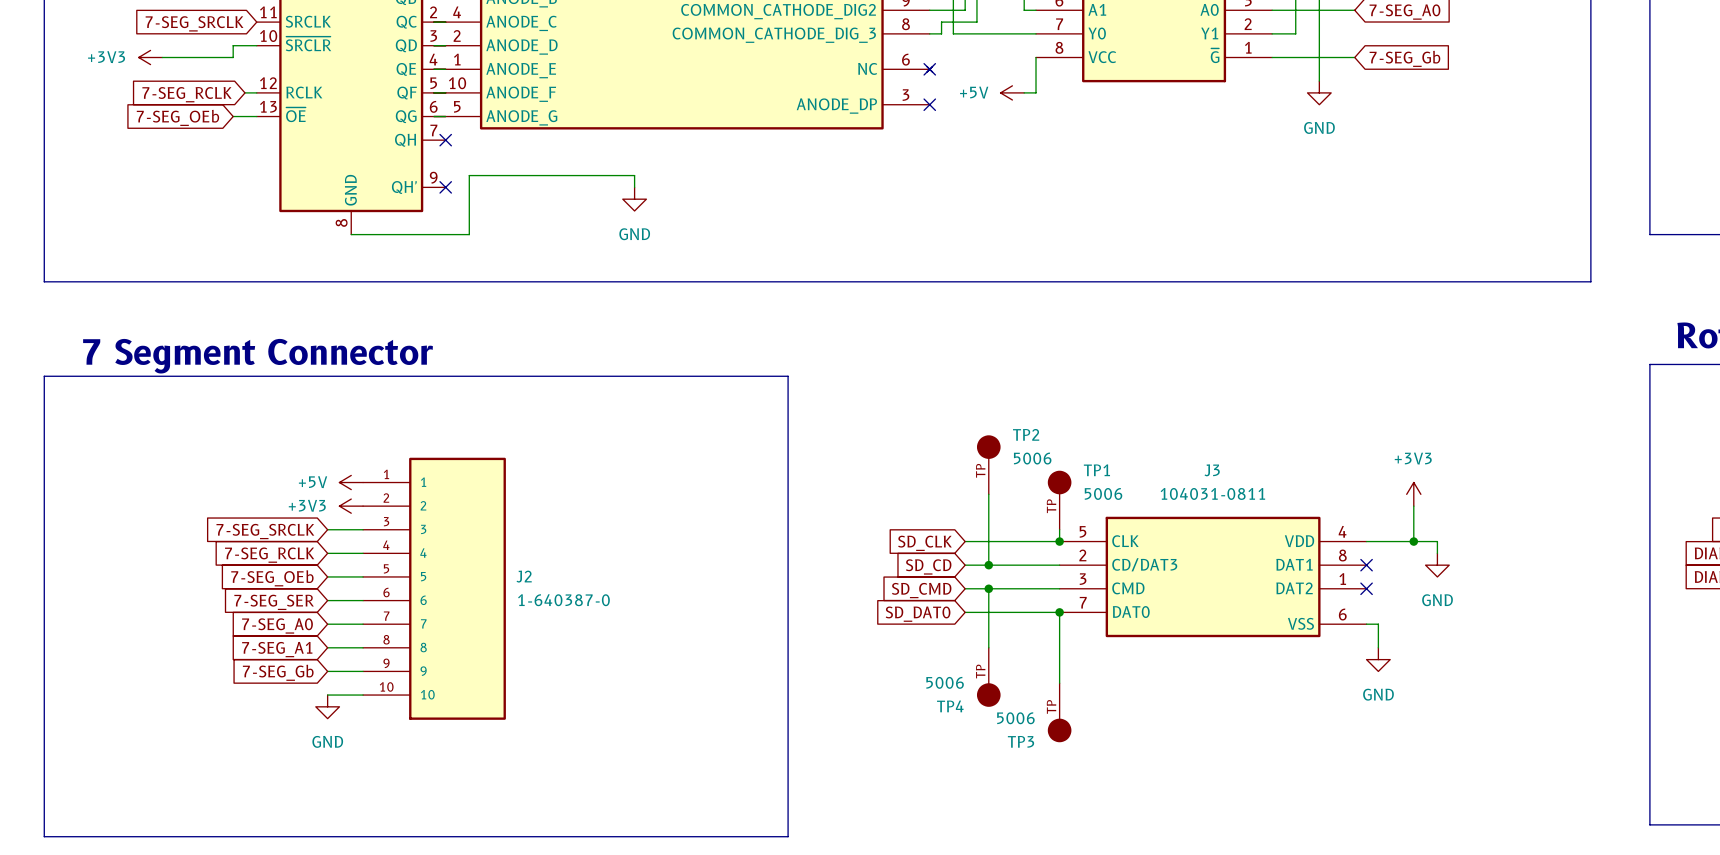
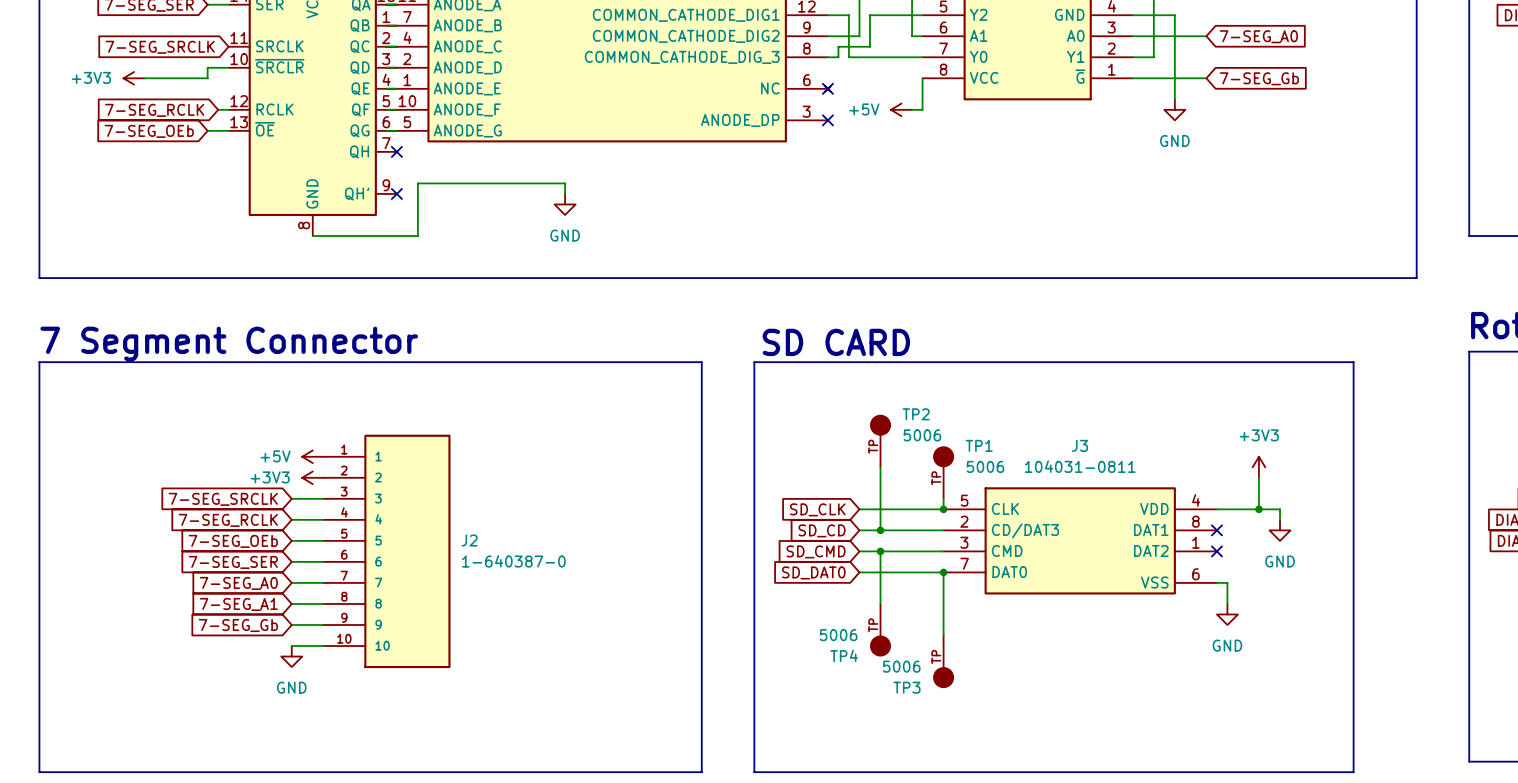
text: none -> SD CARD (836, 342)
line: none -> (754, 362) (1353, 362) (1353, 772) (754, 772) (754, 362)

